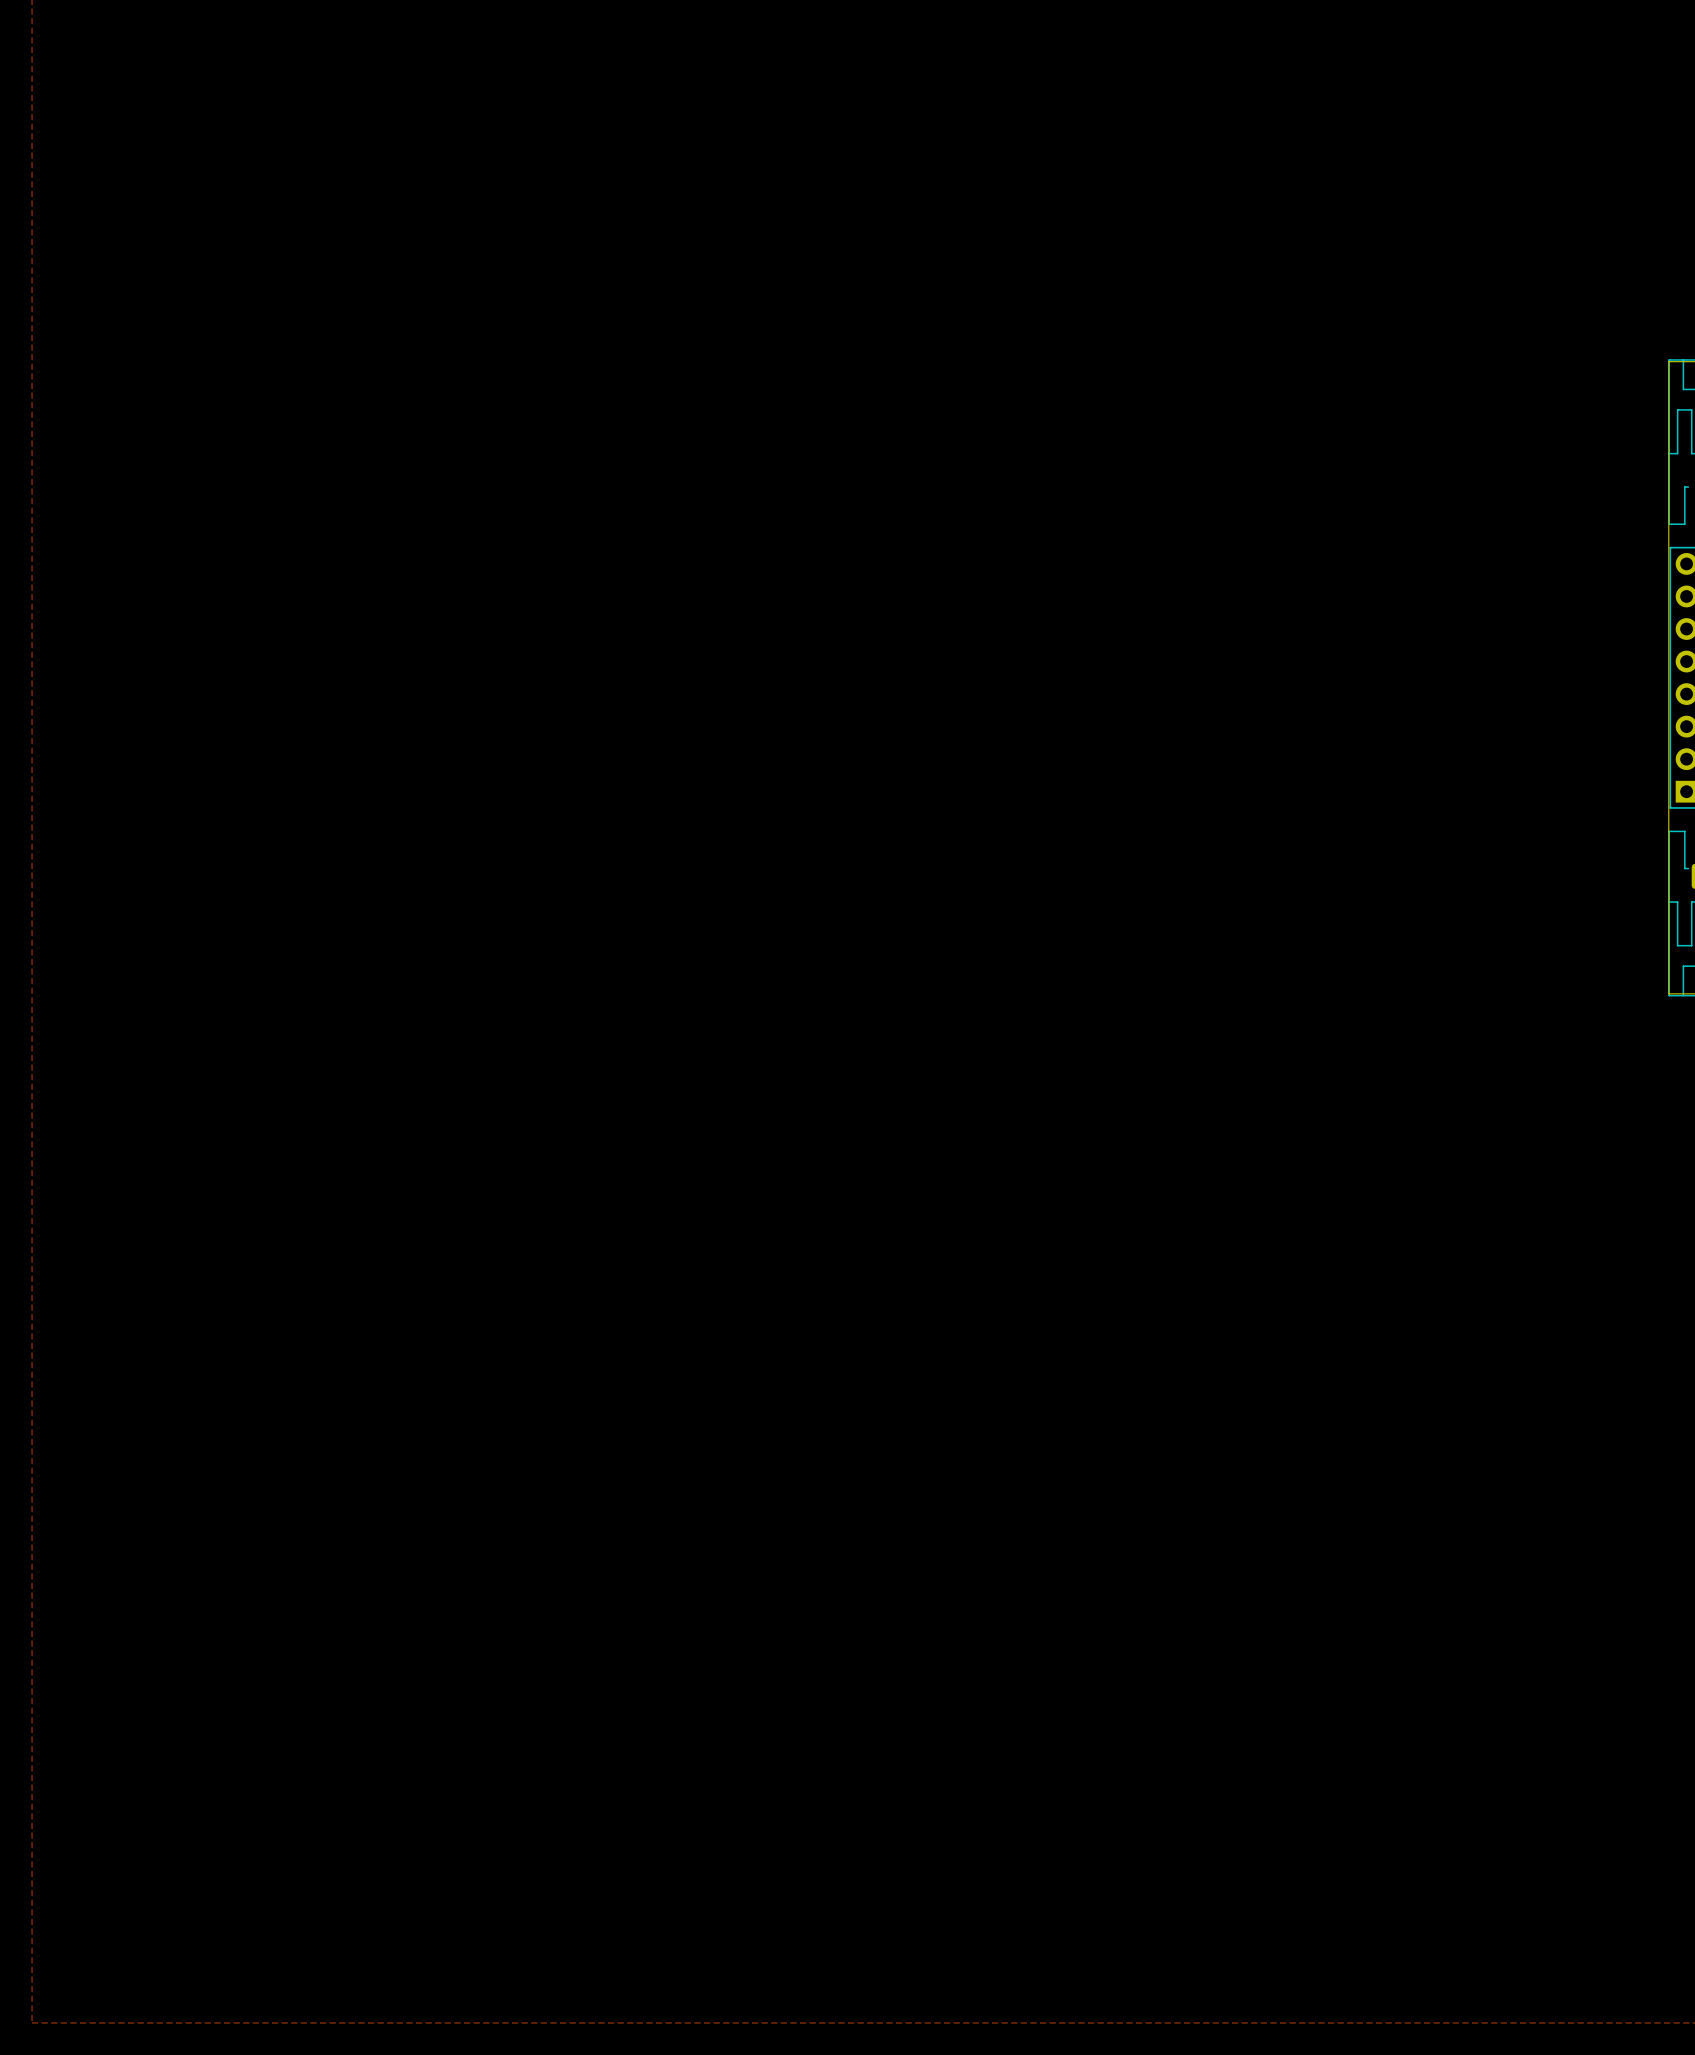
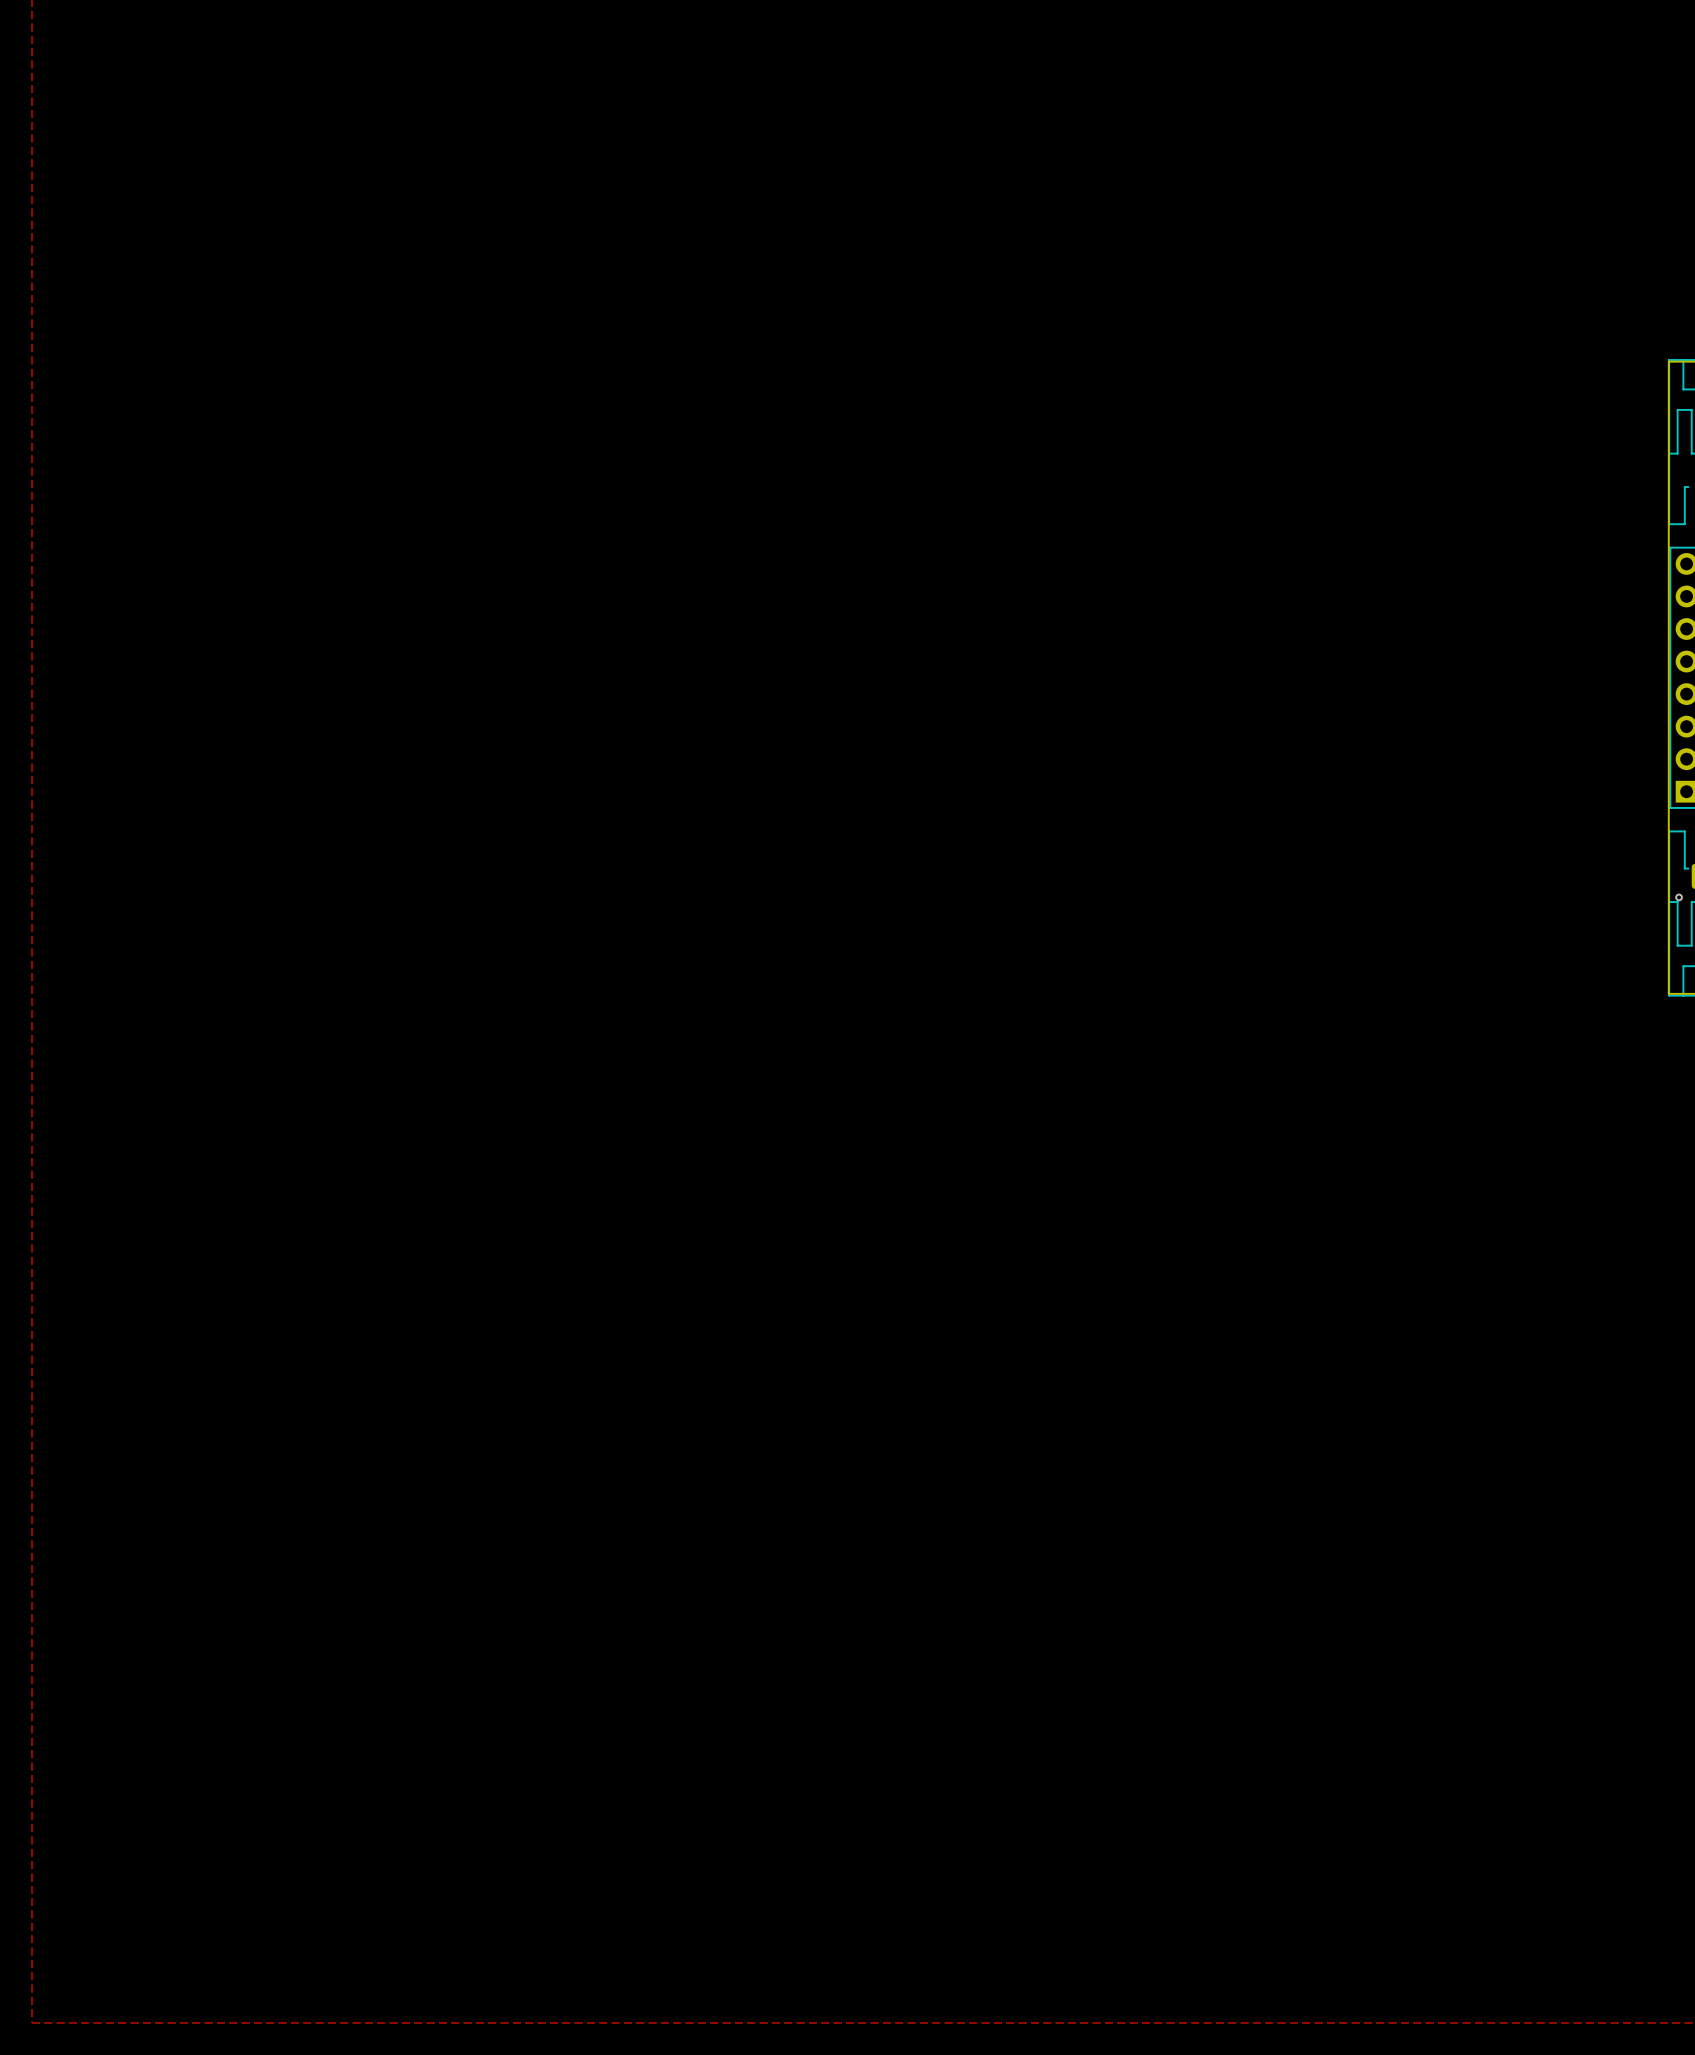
via: none -> (1679, 897)

